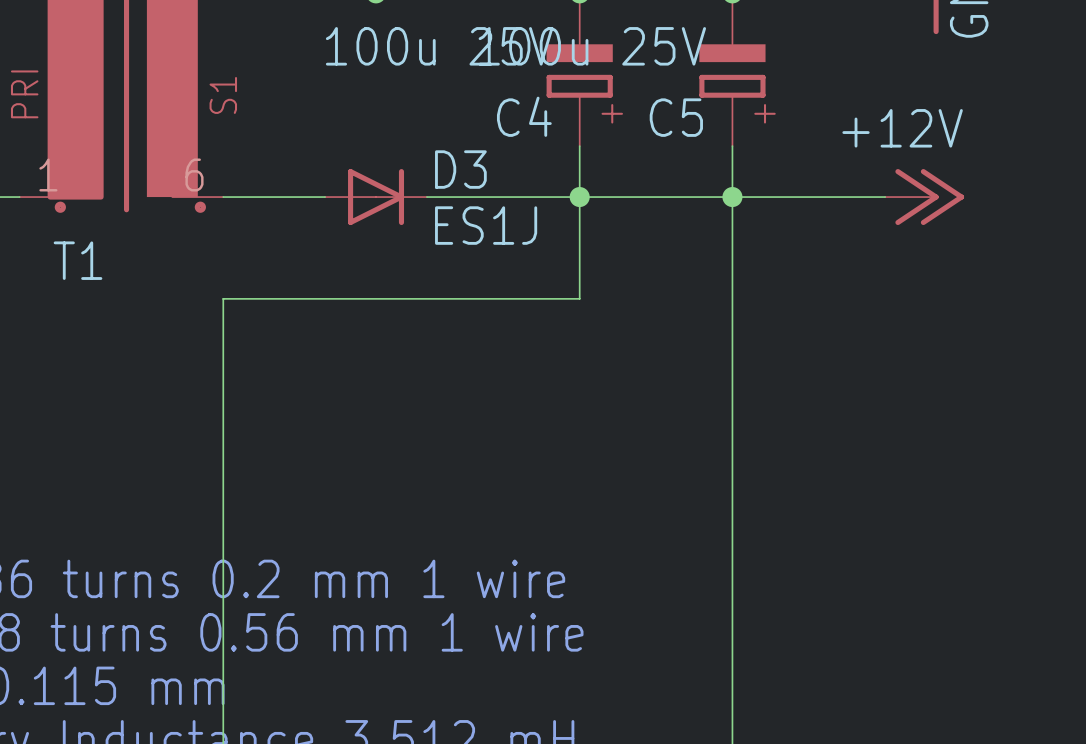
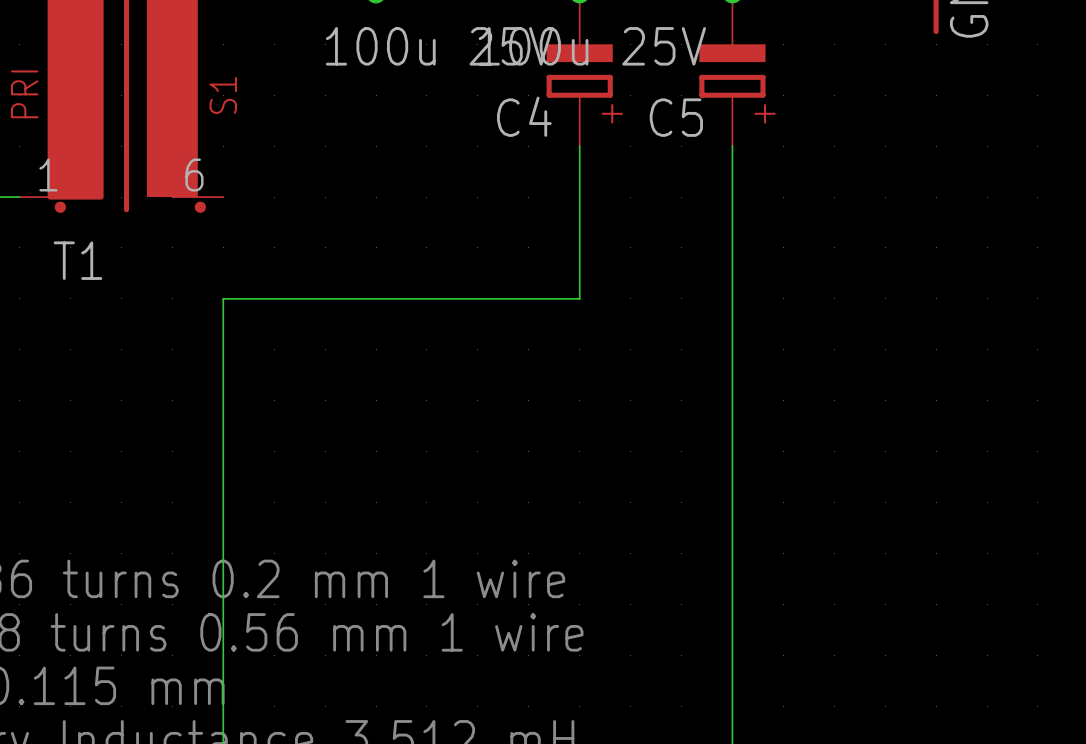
wire: (223, 197) (325, 197) -> none
D3: ES1J (376, 197) -> none
wire: (426, 197) (885, 197) -> none
junction: (579, 197) -> none
junction: (732, 197) -> none
power symbol: +12V (924, 197) -> none

